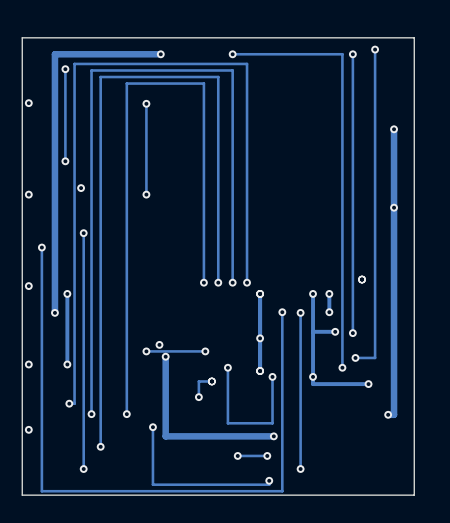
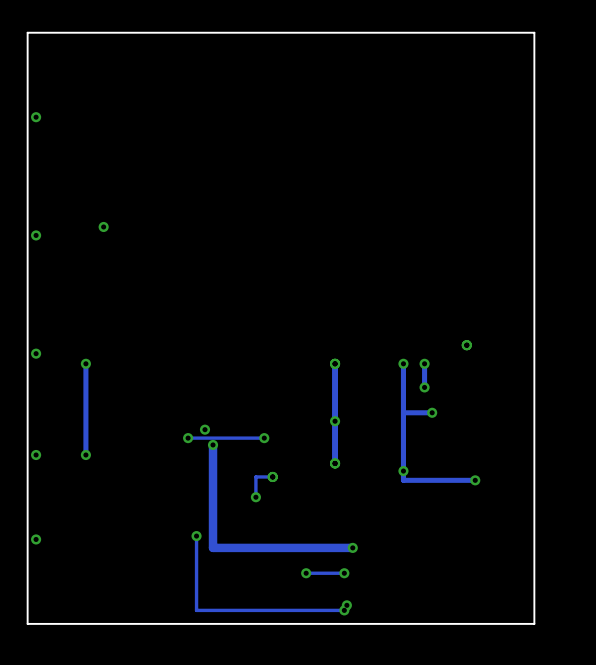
track: (375, 49) (375, 357) (355, 357) -> none
via: (375, 49) -> none
track: (160, 54) (54, 54) (54, 312) -> none
via: (160, 54) -> none
track: (232, 54) (342, 54) (342, 367) -> none
via: (232, 54) -> none
track: (352, 54) (352, 333) -> none
via: (352, 54) -> none
track: (65, 69) (65, 161) -> none
via: (65, 69) -> none
track: (146, 103) (146, 194) -> none
via: (146, 103) -> none
track: (394, 129) (394, 414) (388, 414) -> none
via: (394, 129) -> none
via: (65, 161) -> none
via: (146, 194) -> none
via: (394, 207) -> none
track: (83, 233) (83, 469) -> none
via: (83, 233) -> none
track: (41, 247) (41, 491) (282, 491) (282, 312) -> none
via: (41, 247) -> none
track: (203, 282) (203, 83) (126, 83) (126, 414) -> none
via: (203, 282) -> none
track: (218, 282) (218, 77) (100, 77) (100, 446) -> none
via: (218, 282) -> none
track: (232, 282) (232, 70) (91, 70) (91, 414) -> none
via: (232, 282) -> none
track: (247, 282) (247, 63) (74, 63) (74, 403) (69, 403) -> none
via: (247, 282) -> none
via: (54, 312) -> none
via: (282, 312) -> none
track: (300, 312) (300, 469) -> none
via: (300, 312) -> none
via: (352, 333) -> none
via: (355, 357) -> none
track: (227, 367) (227, 423) (272, 423) (272, 376) -> none
via: (227, 367) -> none
via: (342, 367) -> none
via: (272, 376) -> none
via: (69, 403) -> none
via: (91, 414) -> none
via: (126, 414) -> none
via: (388, 414) -> none
via: (100, 446) -> none
via: (83, 469) -> none
via position: (300, 469) -> (344, 610)

